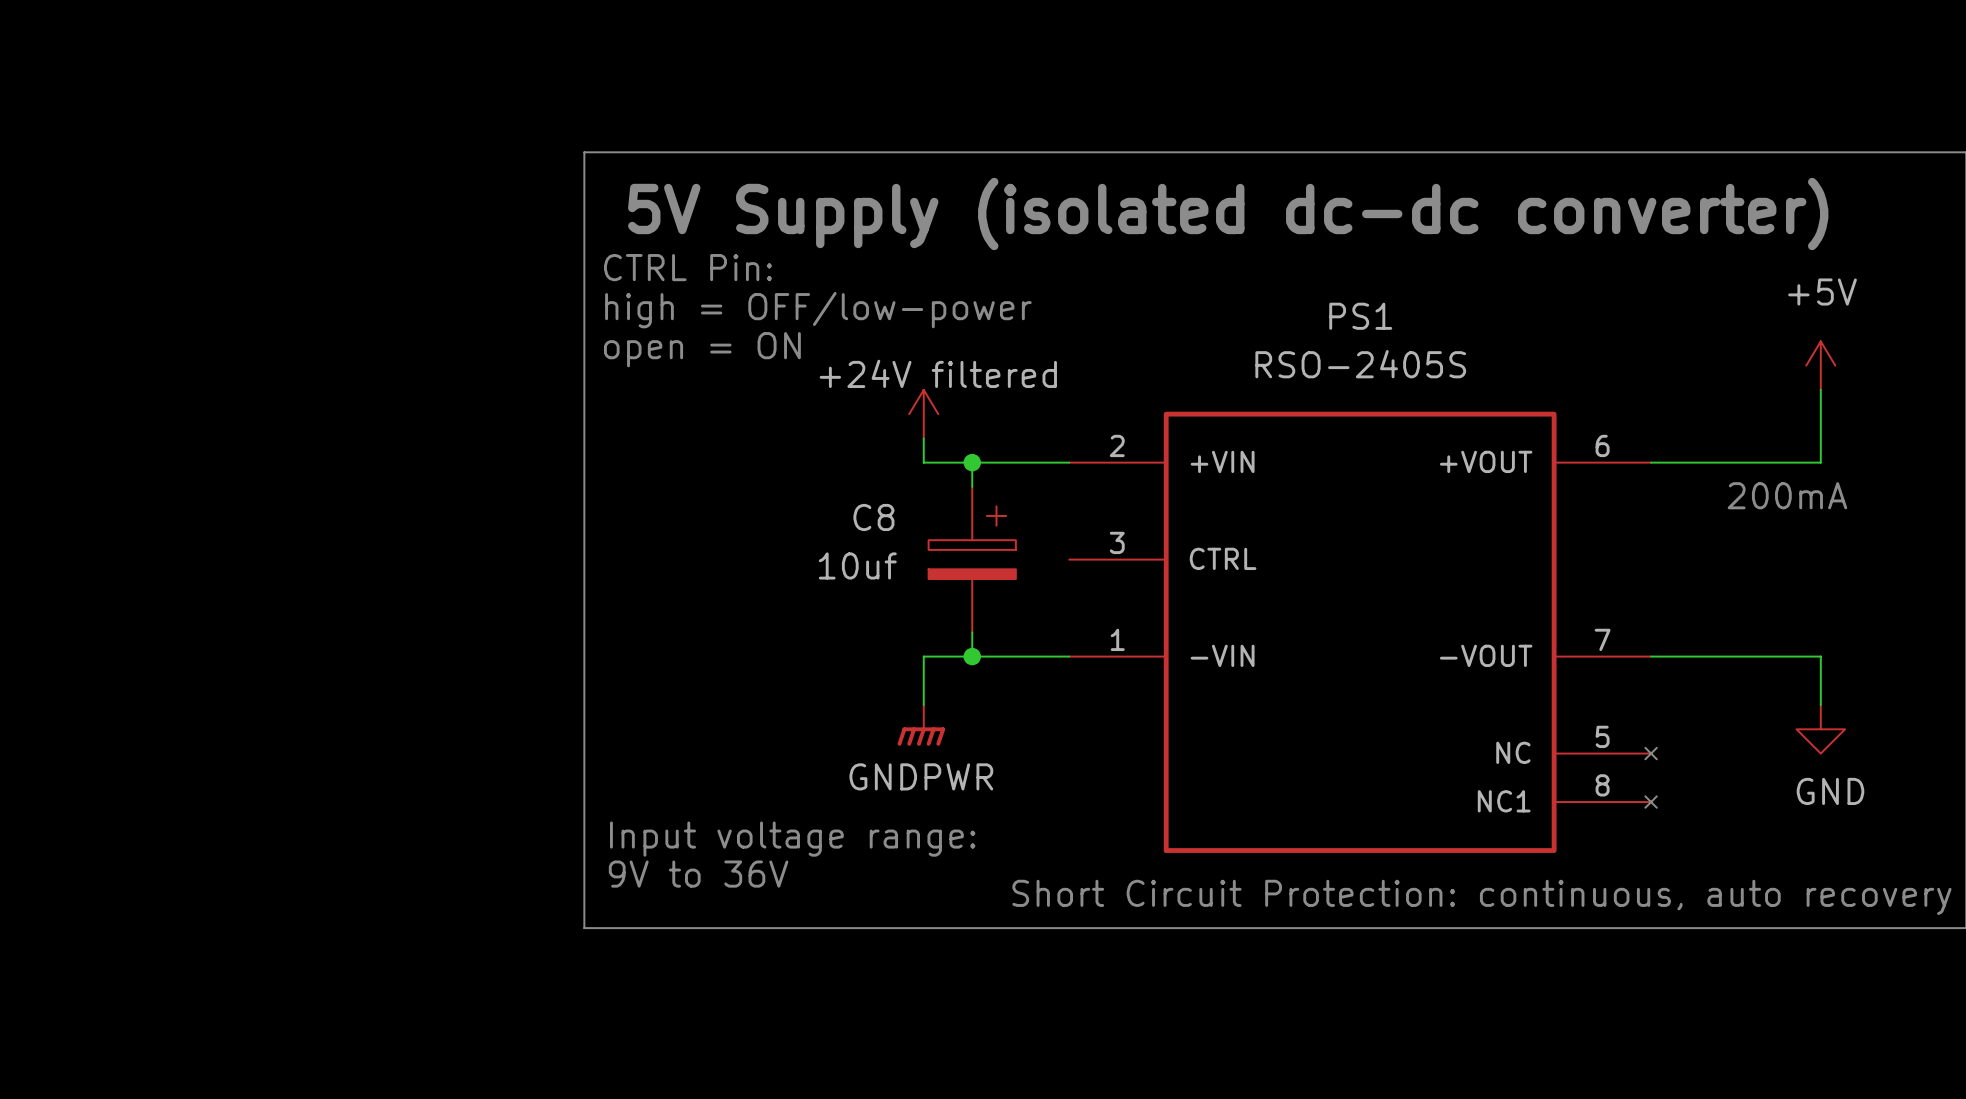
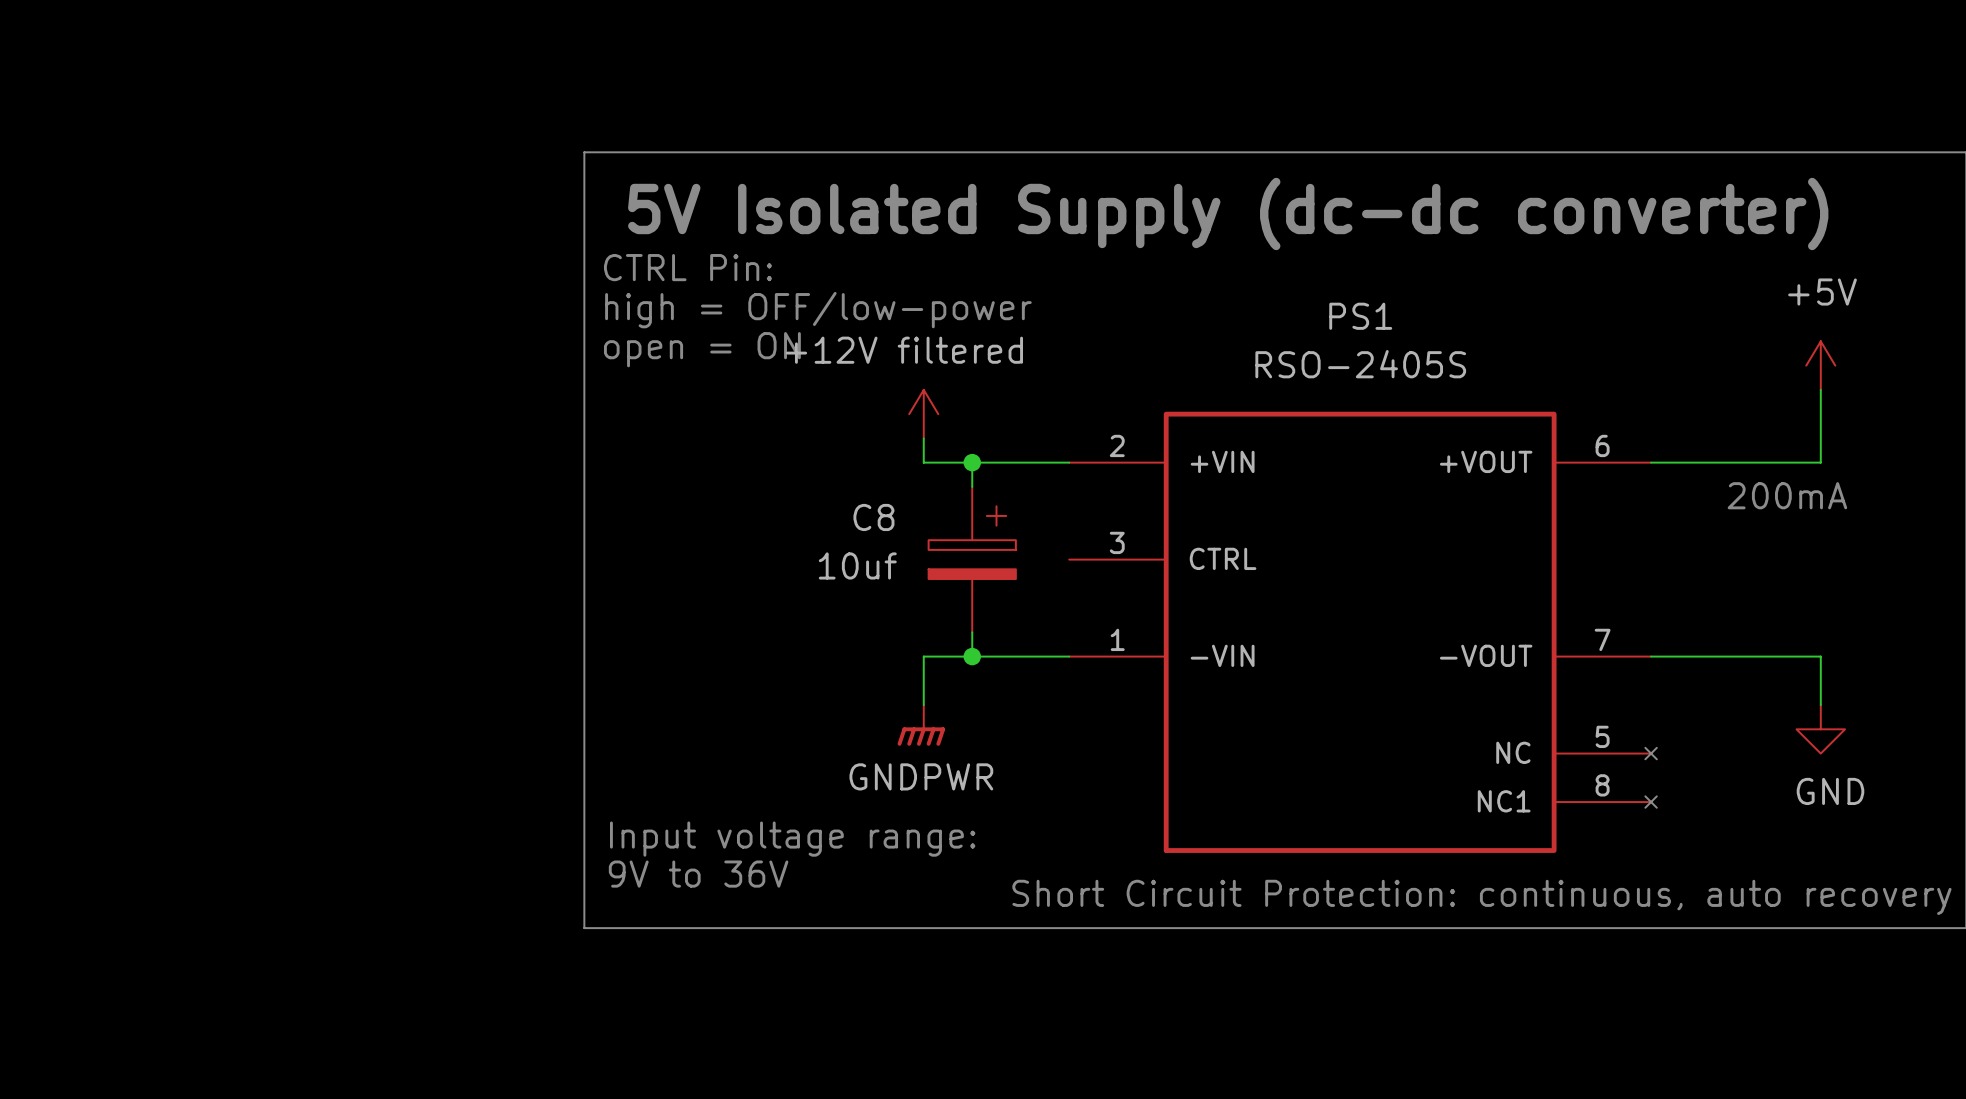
text: 5V Supply (isolated dc-dc converter) (1228, 213) -> 5V Isolated Supply (dc-dc converter) (1228, 213)
power symbol: +24V filtered (923, 414) -> +12V filtered (923, 414)

